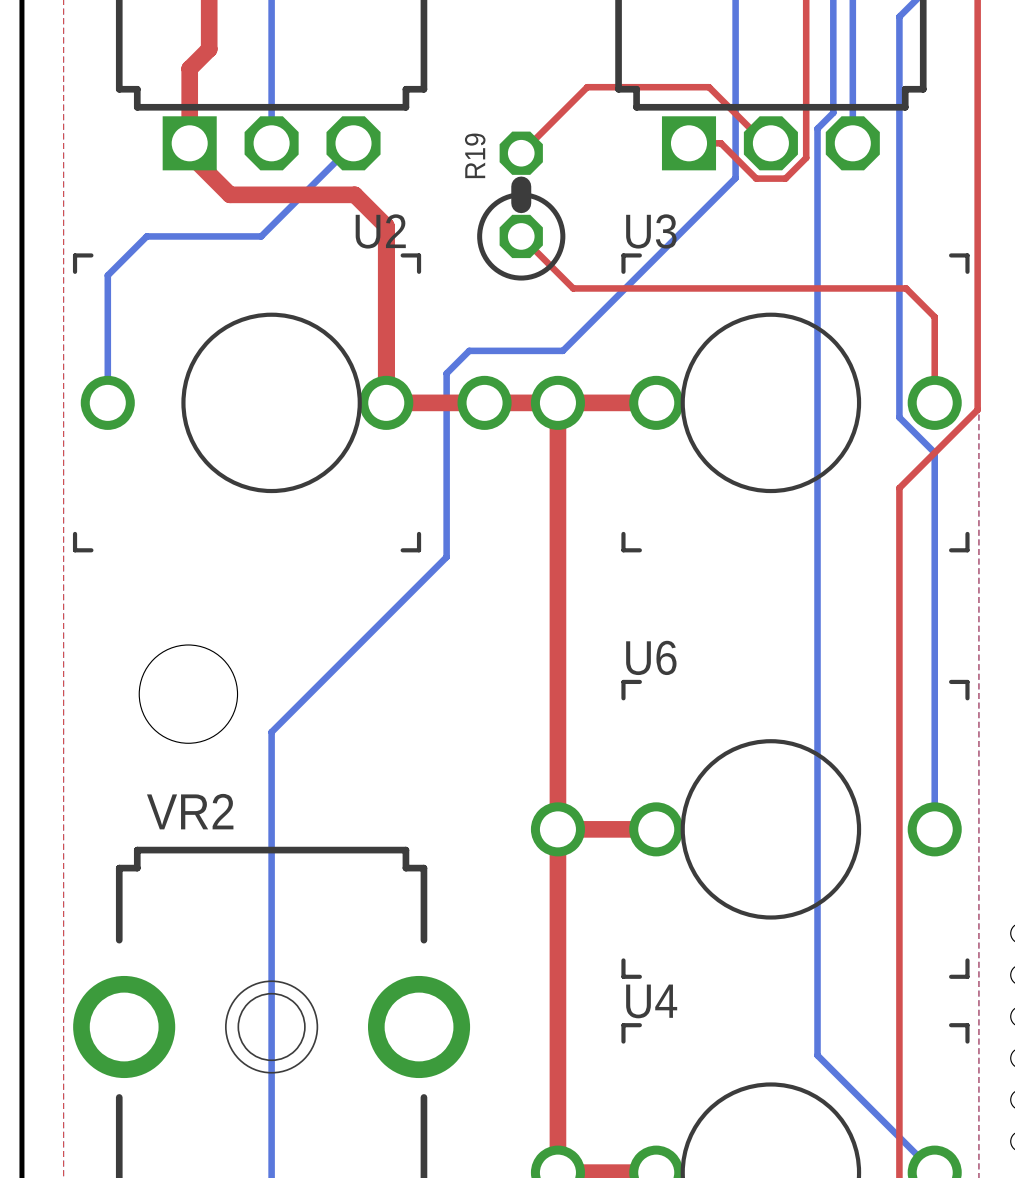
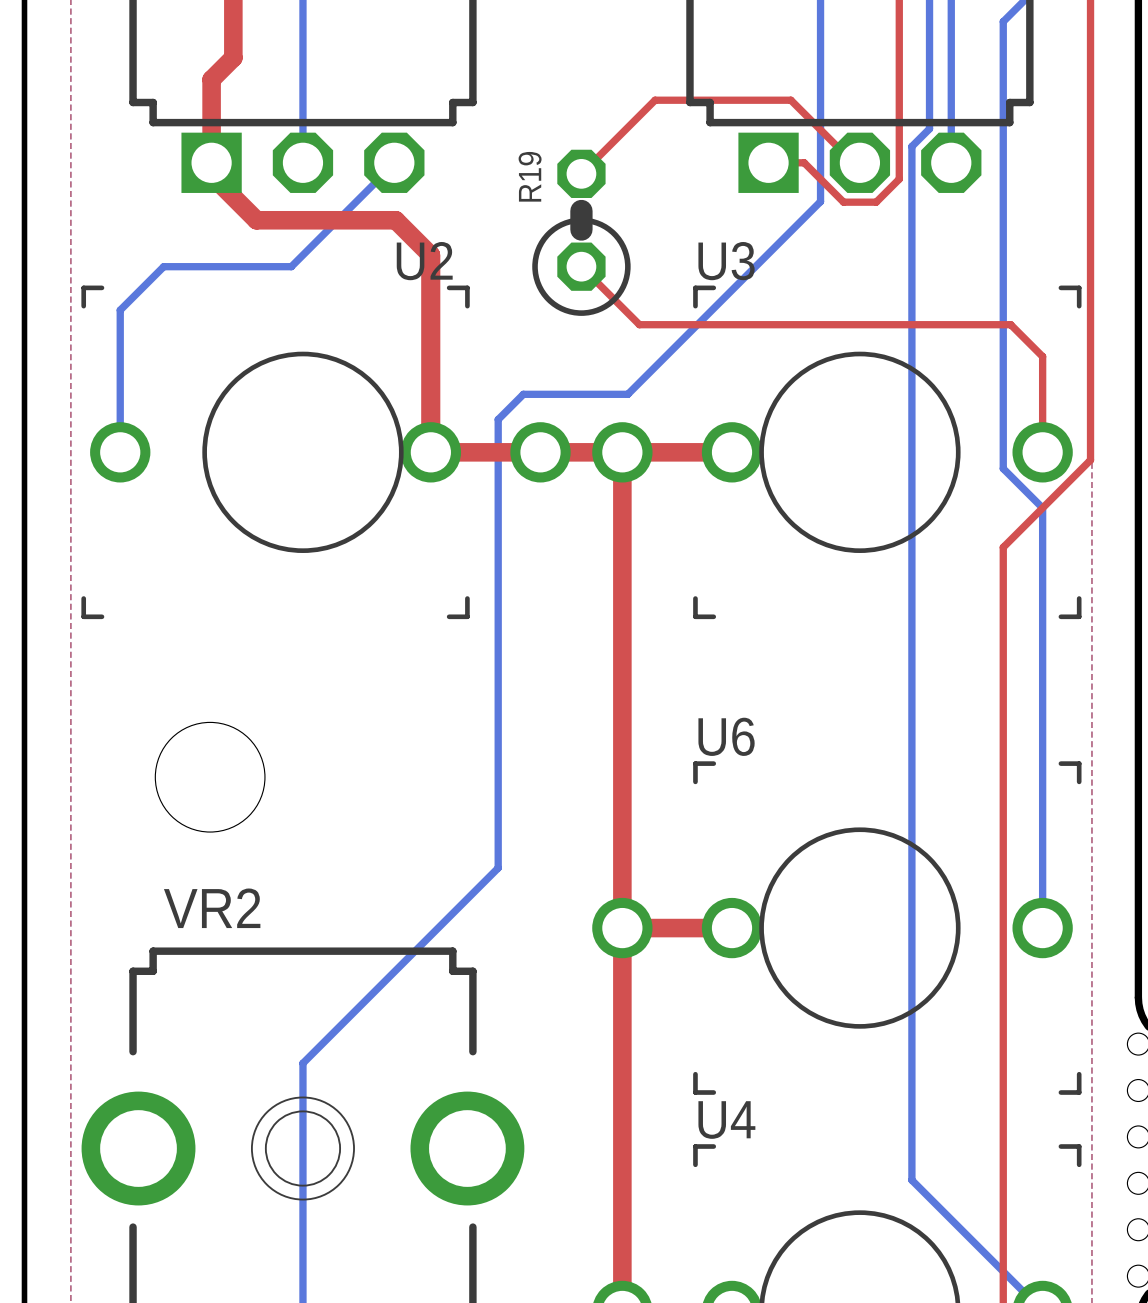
bottom track: (446, 557) (271, 732) (271, 950) -> (498, 624) (498, 868) (302, 1063)

